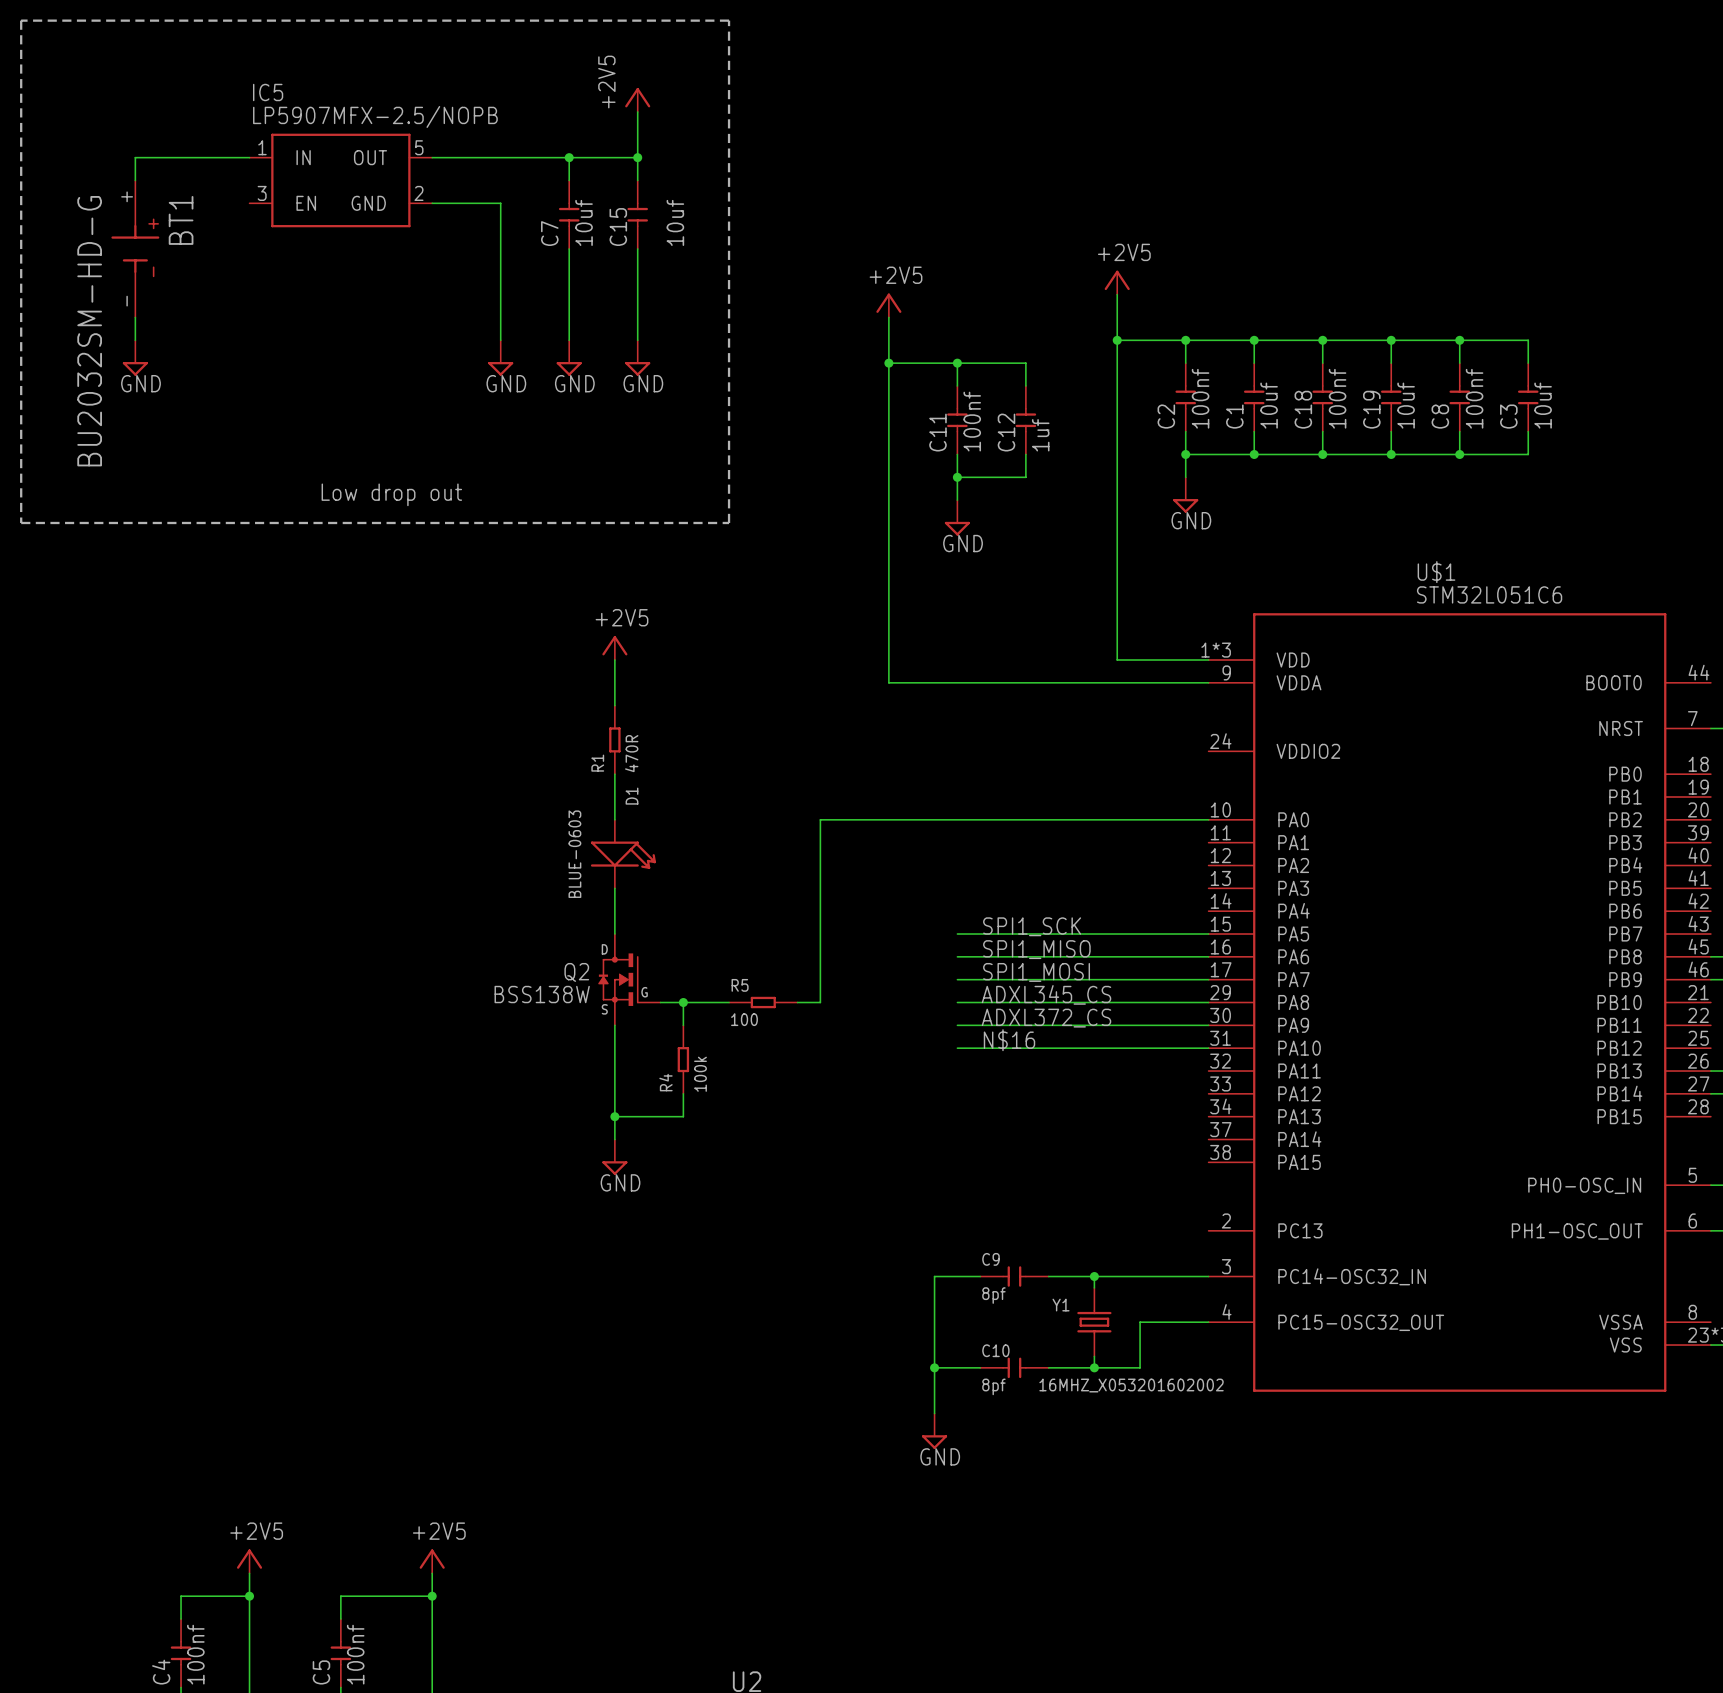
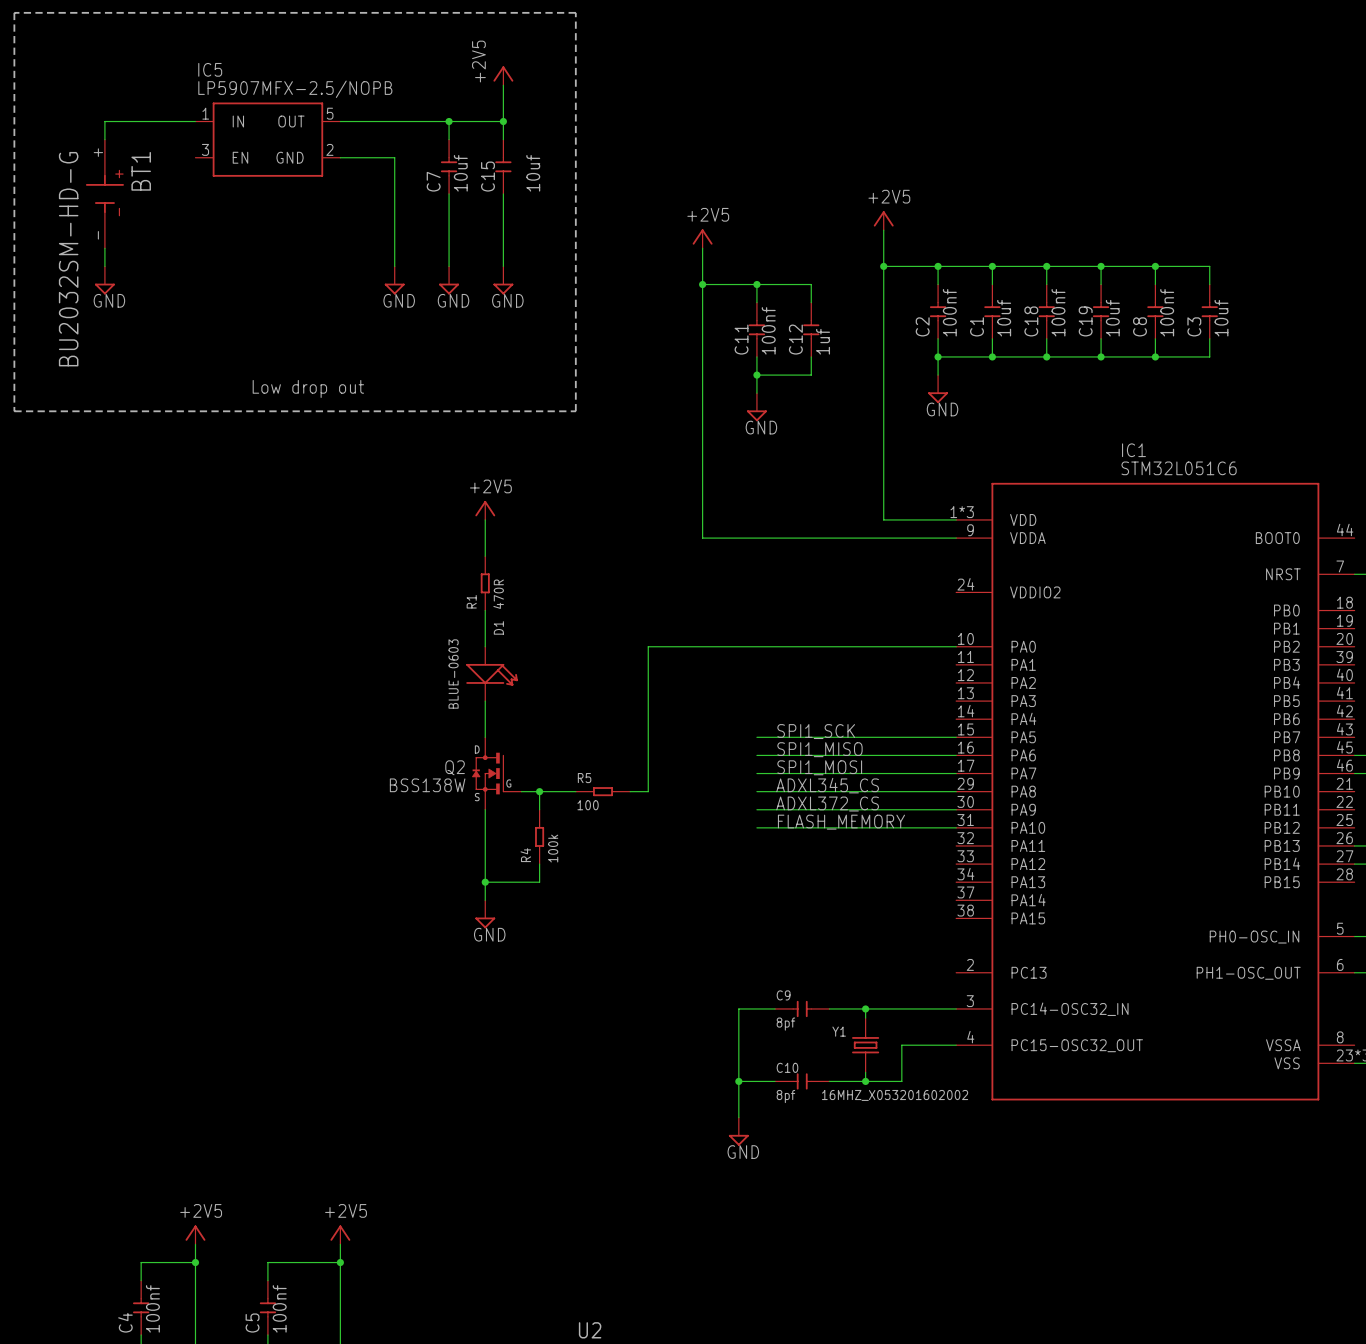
U$1 name: U$1 (1436, 572) -> IC1 (1133, 450)
label: N$16 (1009, 1040) -> FLASH_MEMORY (841, 822)

